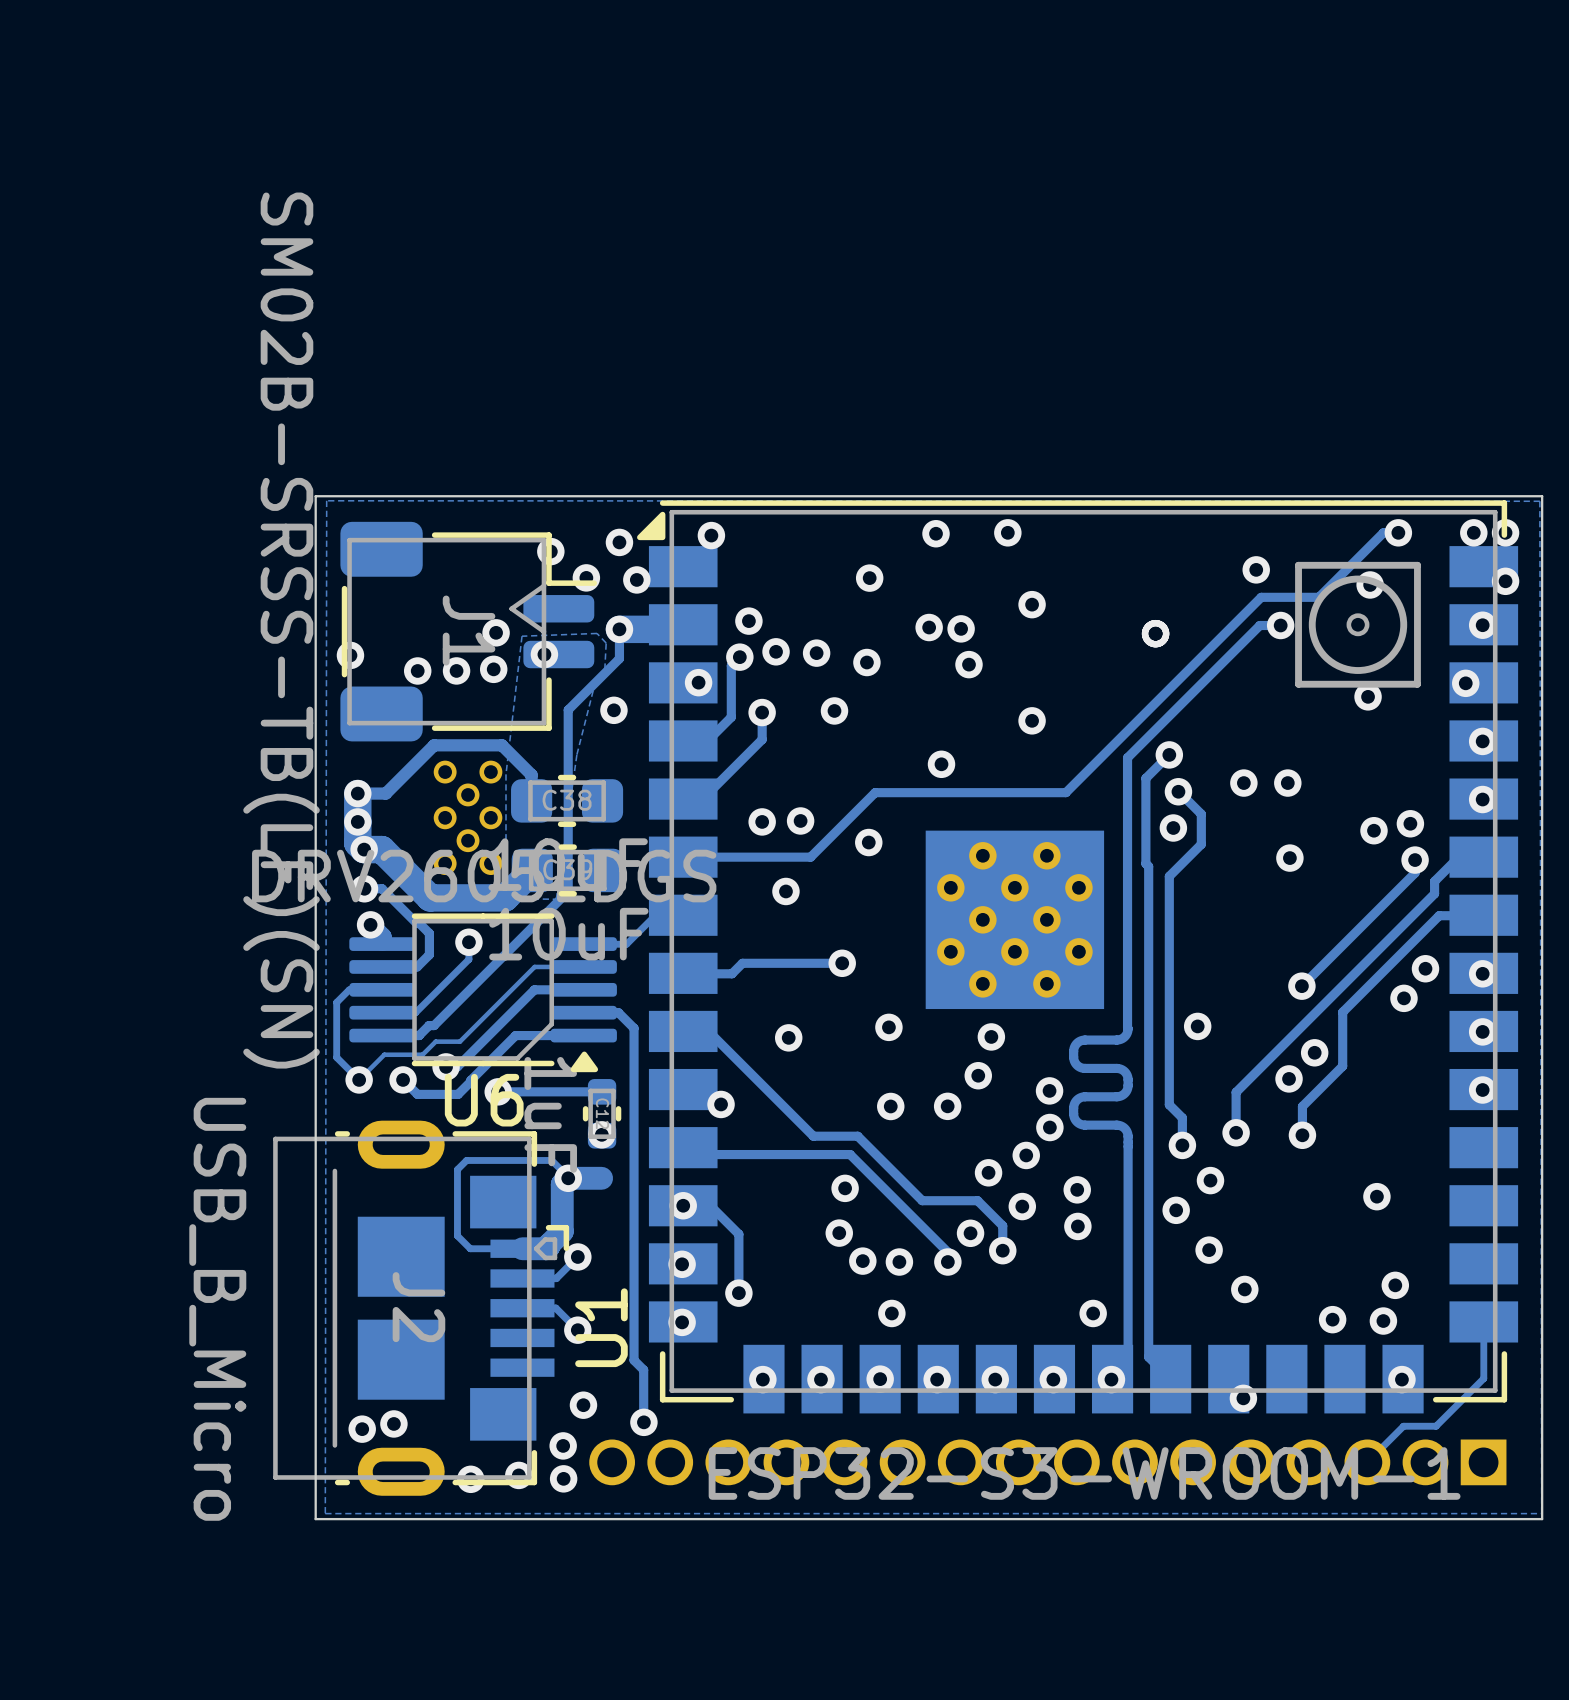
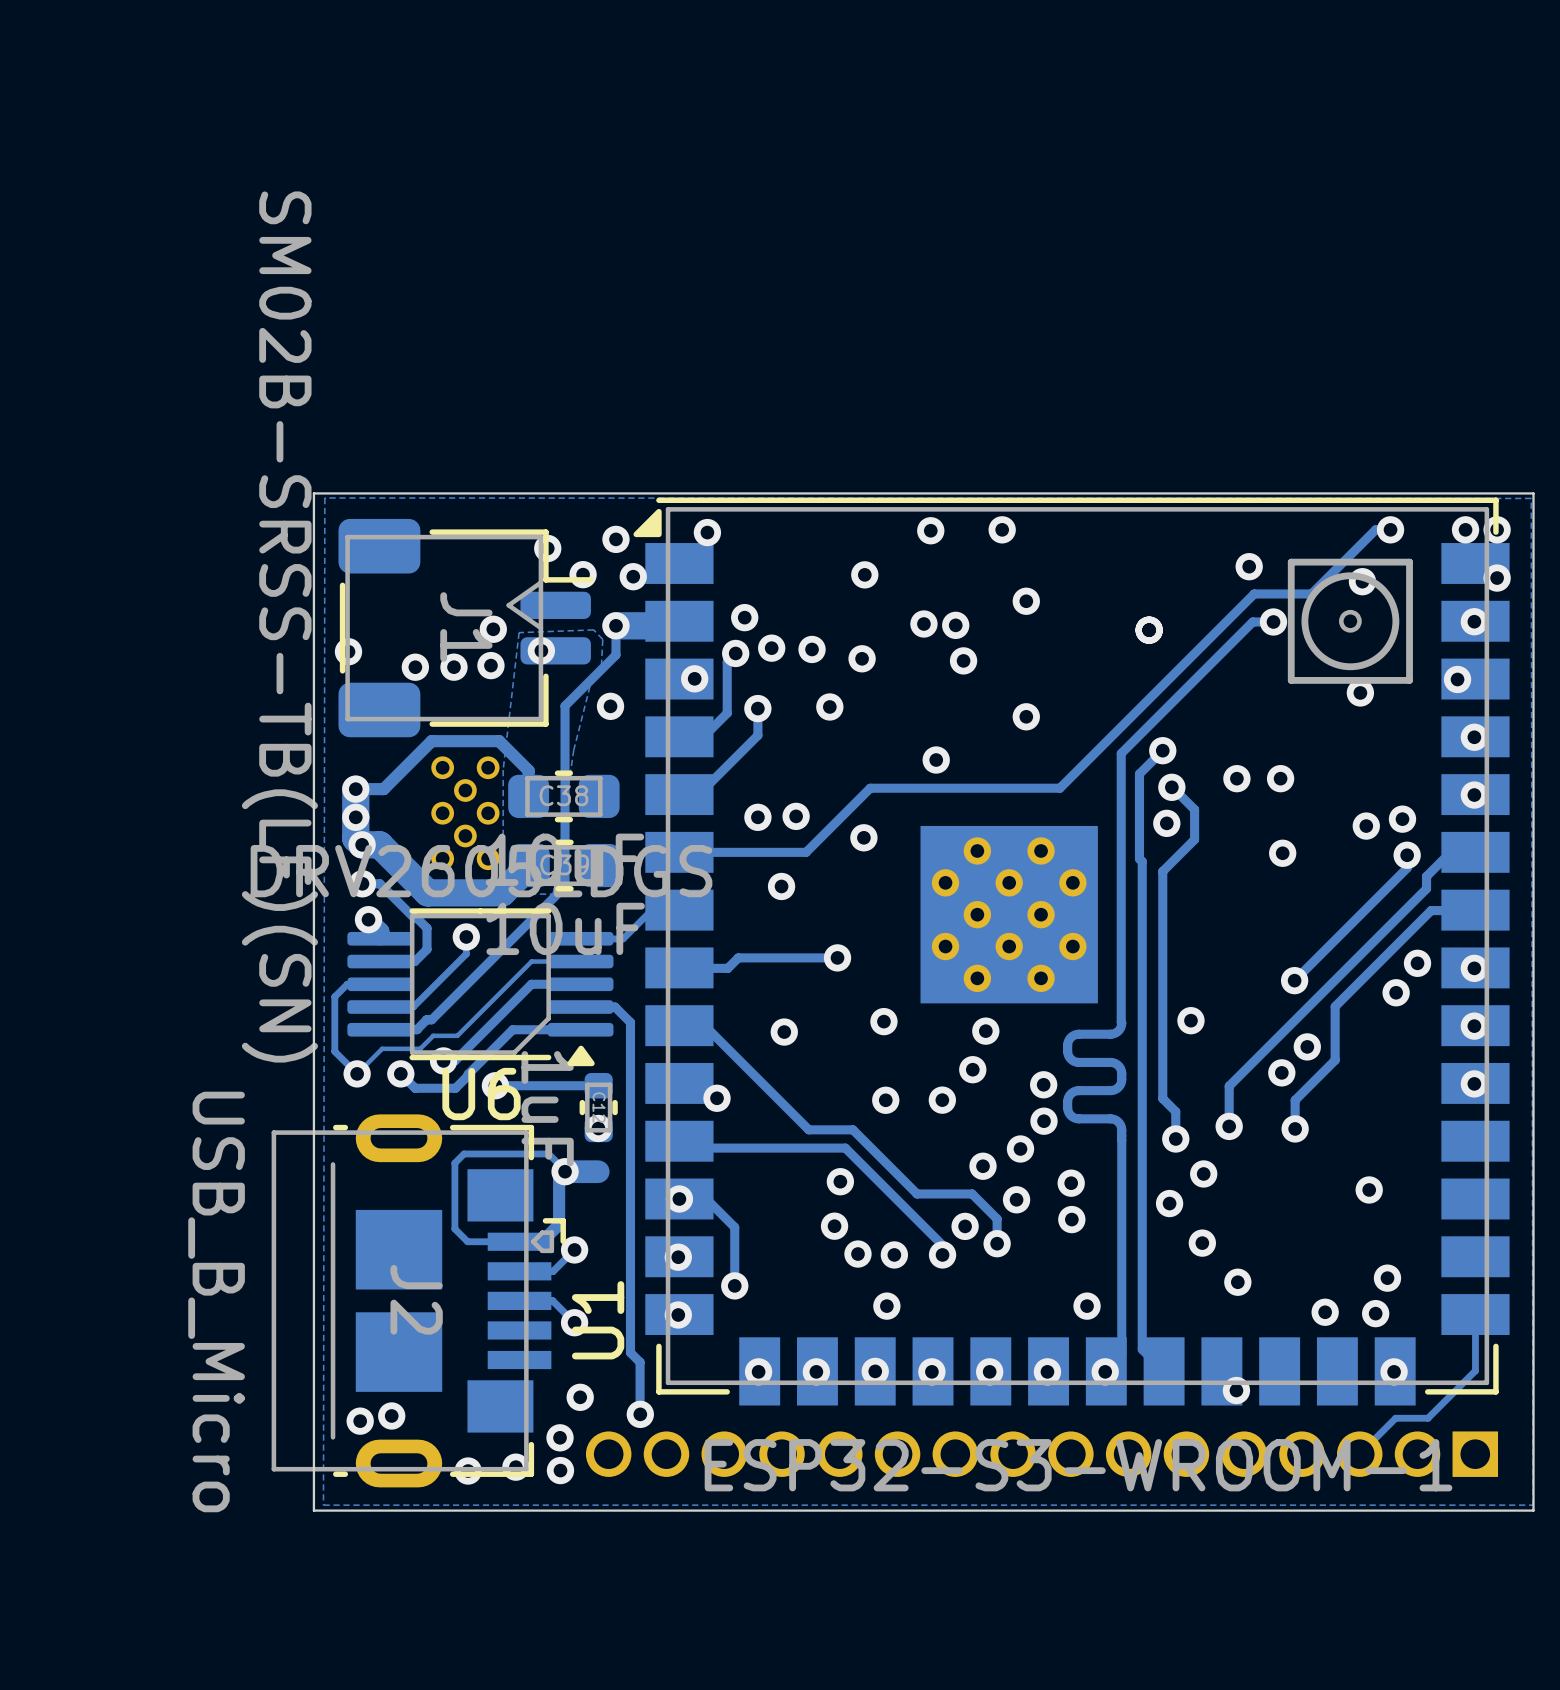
track width: thick (568, 1178) (562, 1184) (562, 1231) (546, 1248) (522, 1248) -> thin (565, 1171) (559, 1177) (559, 1224) (543, 1241) (519, 1241)

